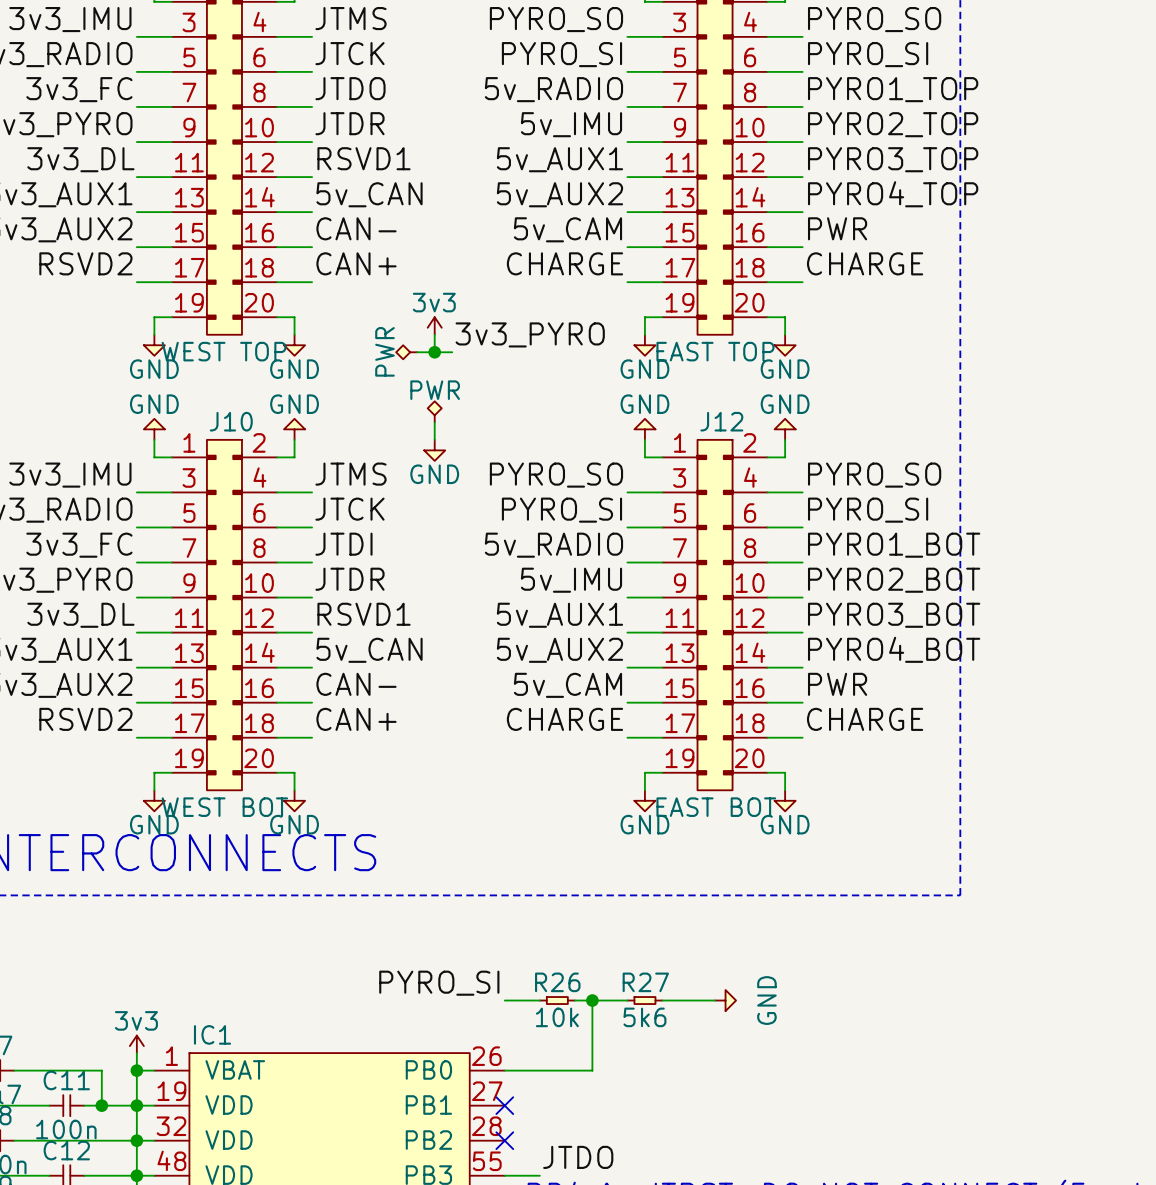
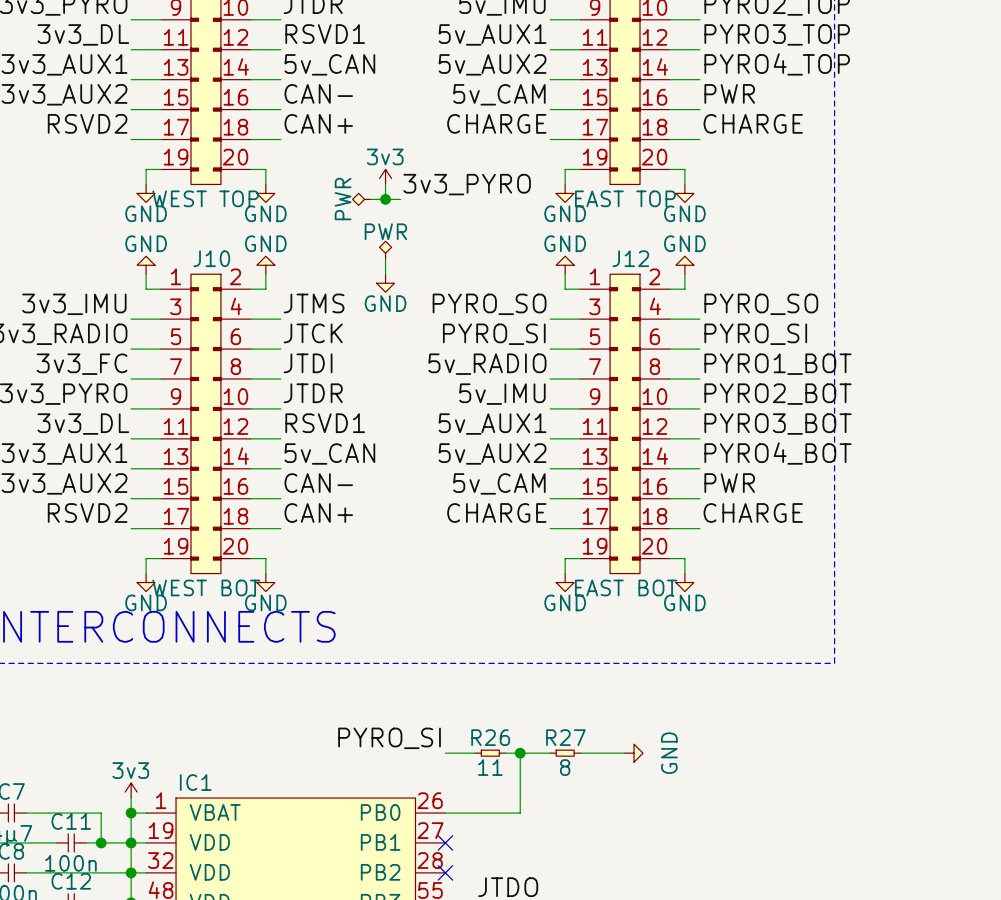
R26 value: 10k (557, 1017) -> 11 (490, 767)
R27 value: 5k6 (644, 1017) -> 8 (565, 767)

